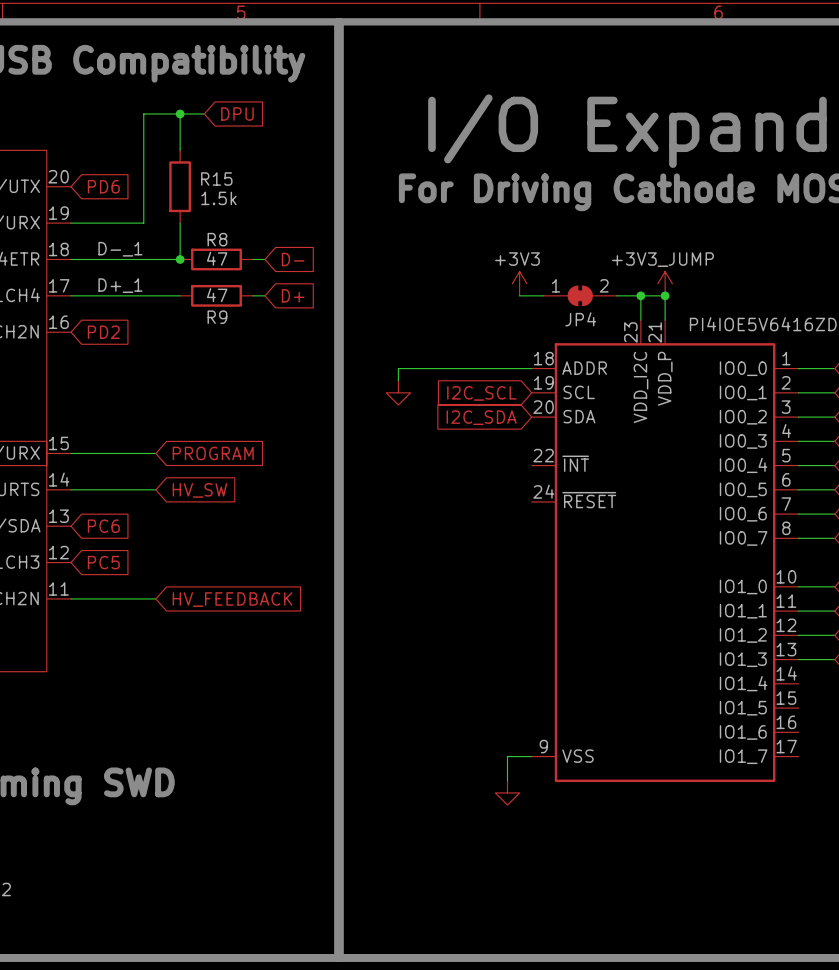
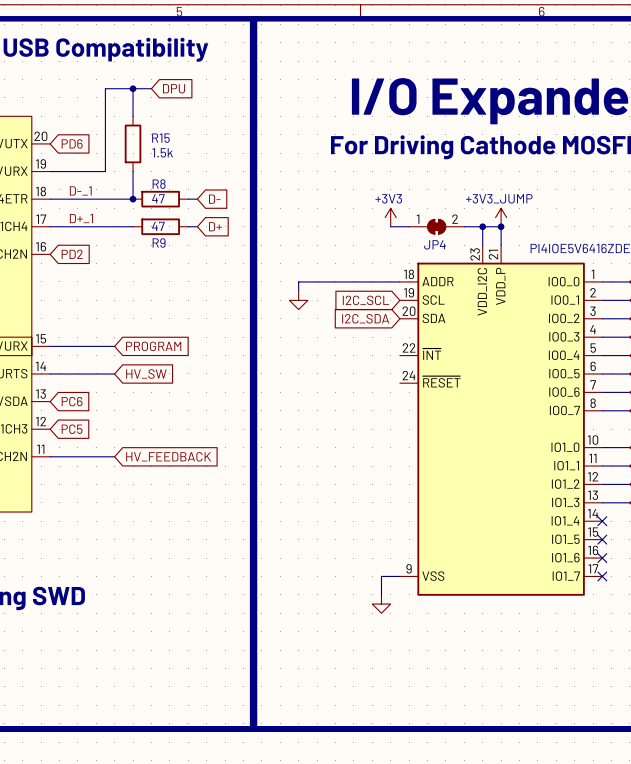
no-connect mark: none -> (602, 521)
no-connect mark: none -> (602, 539)
no-connect mark: none -> (602, 558)
no-connect mark: none -> (602, 576)

